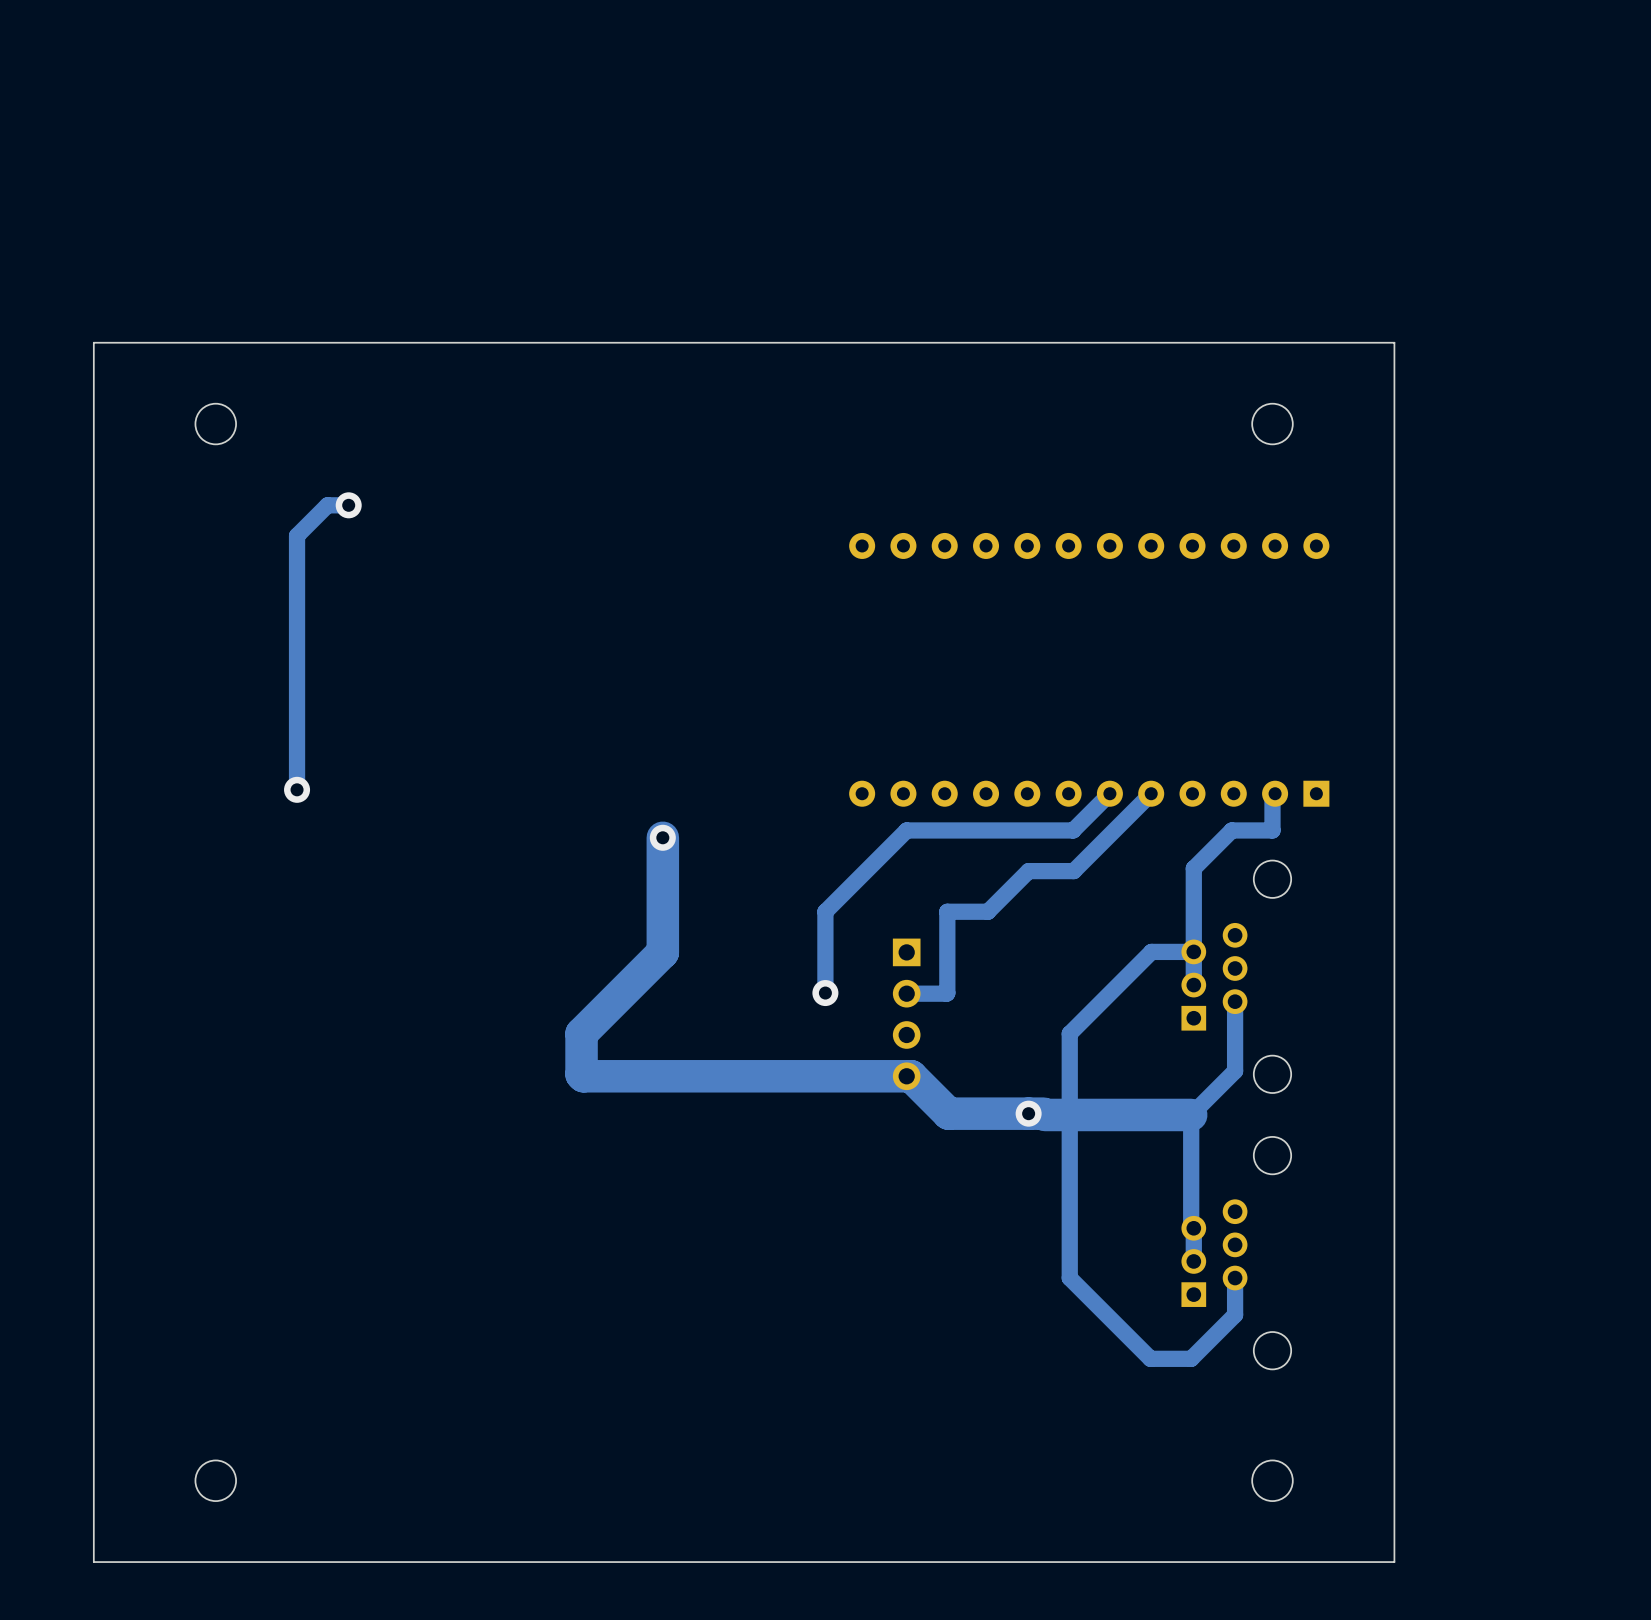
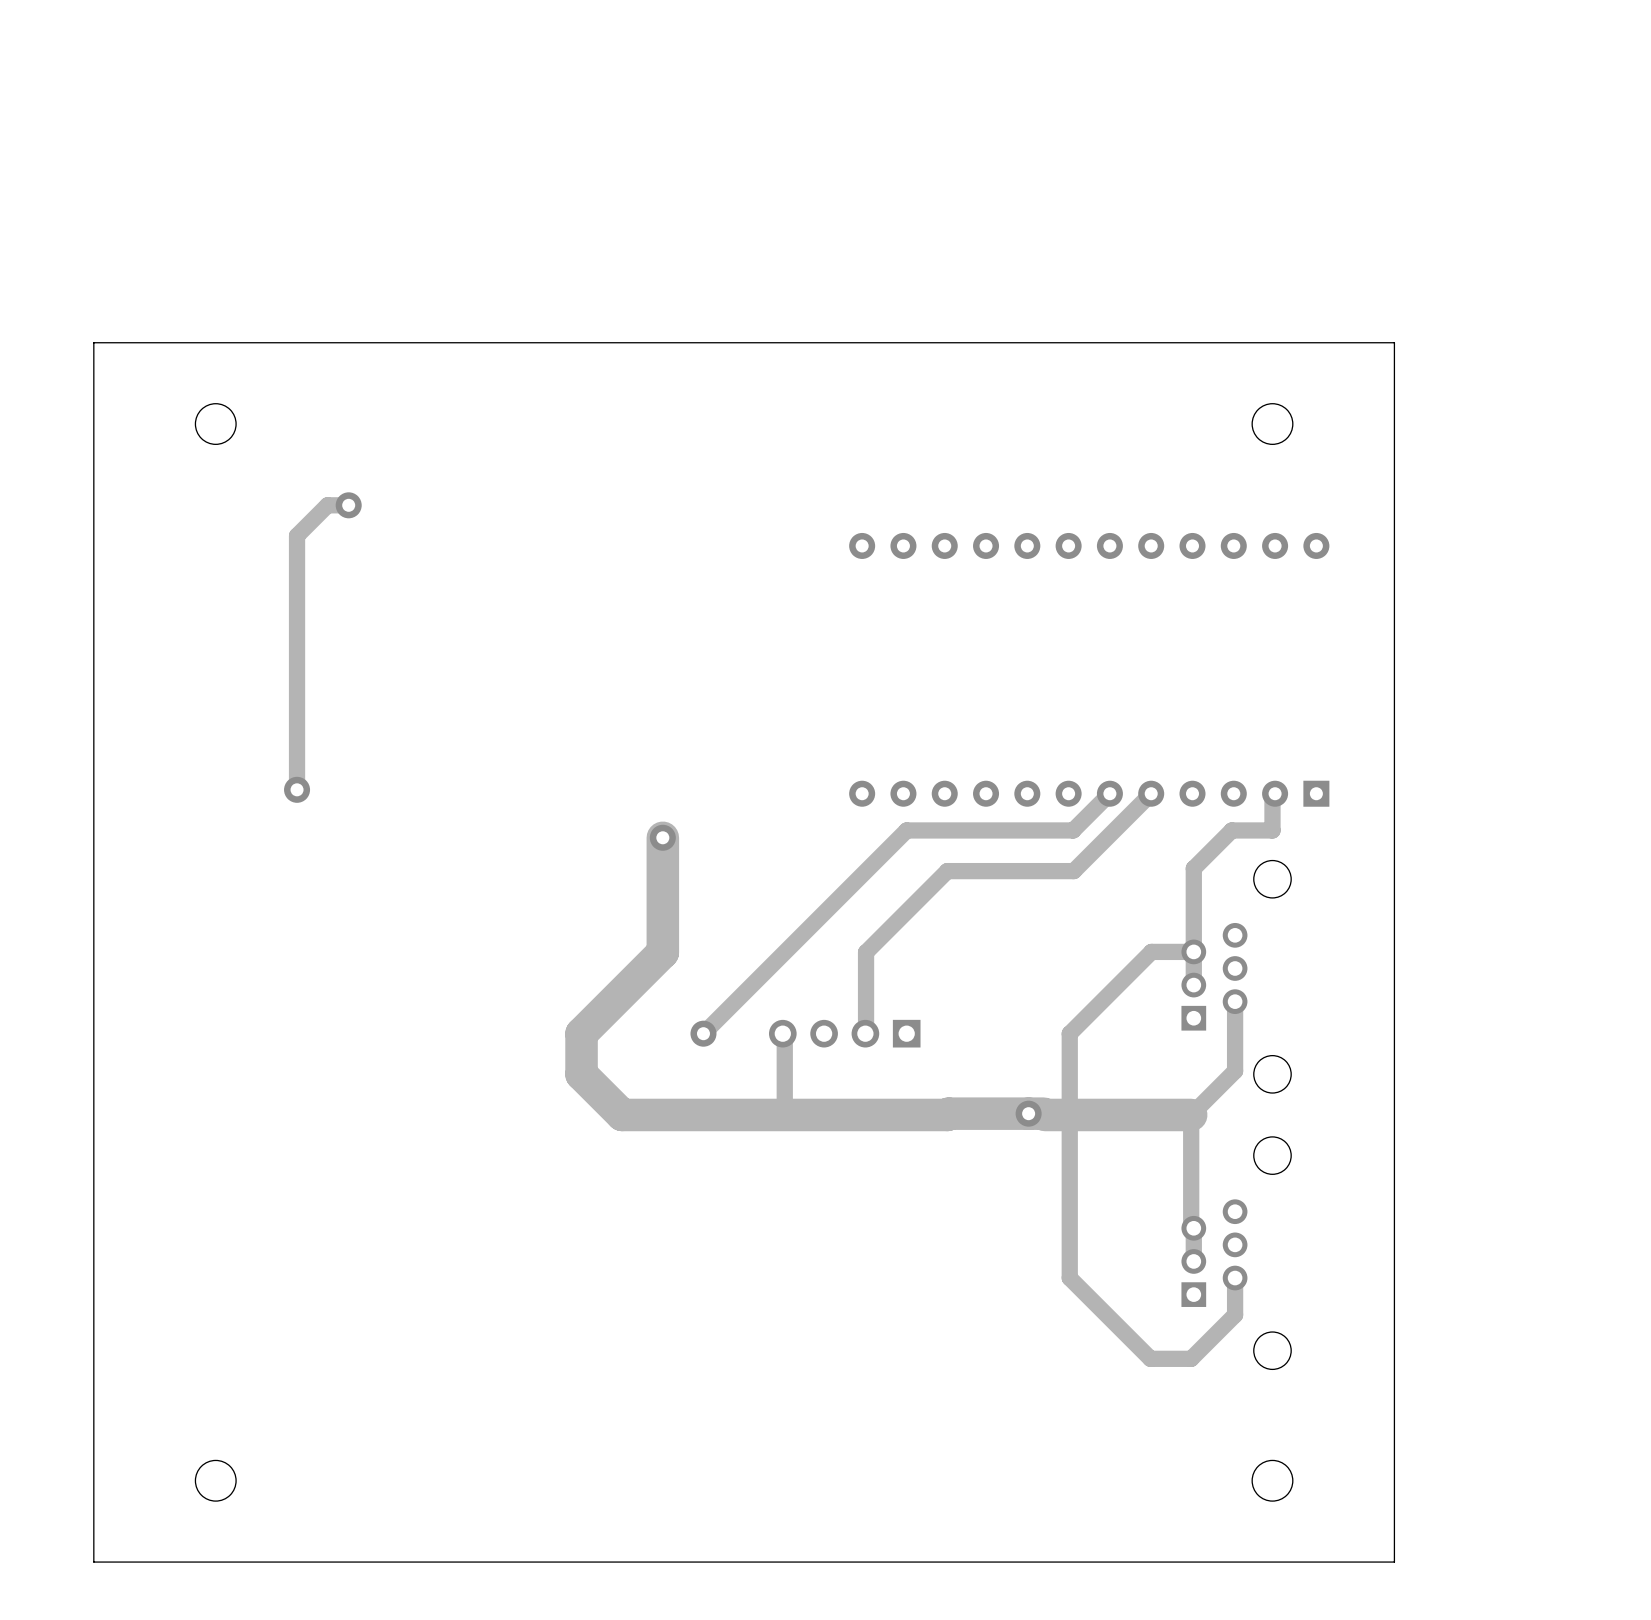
track: (1028, 871) (987, 911) (947, 911) (947, 993) (906, 993) -> (1028, 871) (947, 871) (866, 952) (865, 1033)
track: (825, 911) (825, 993) -> (825, 911) (703, 1033)
via: (825, 993) -> none
part rotation: 0° (906, 1014) -> 90° clockwise (844, 1033)
via: none -> (703, 1033)
track: none -> (782, 1033) (784, 1035) (784, 1114)
track: (583, 1076) (911, 1076) (948, 1113) -> (583, 1076) (622, 1114) (948, 1113)

